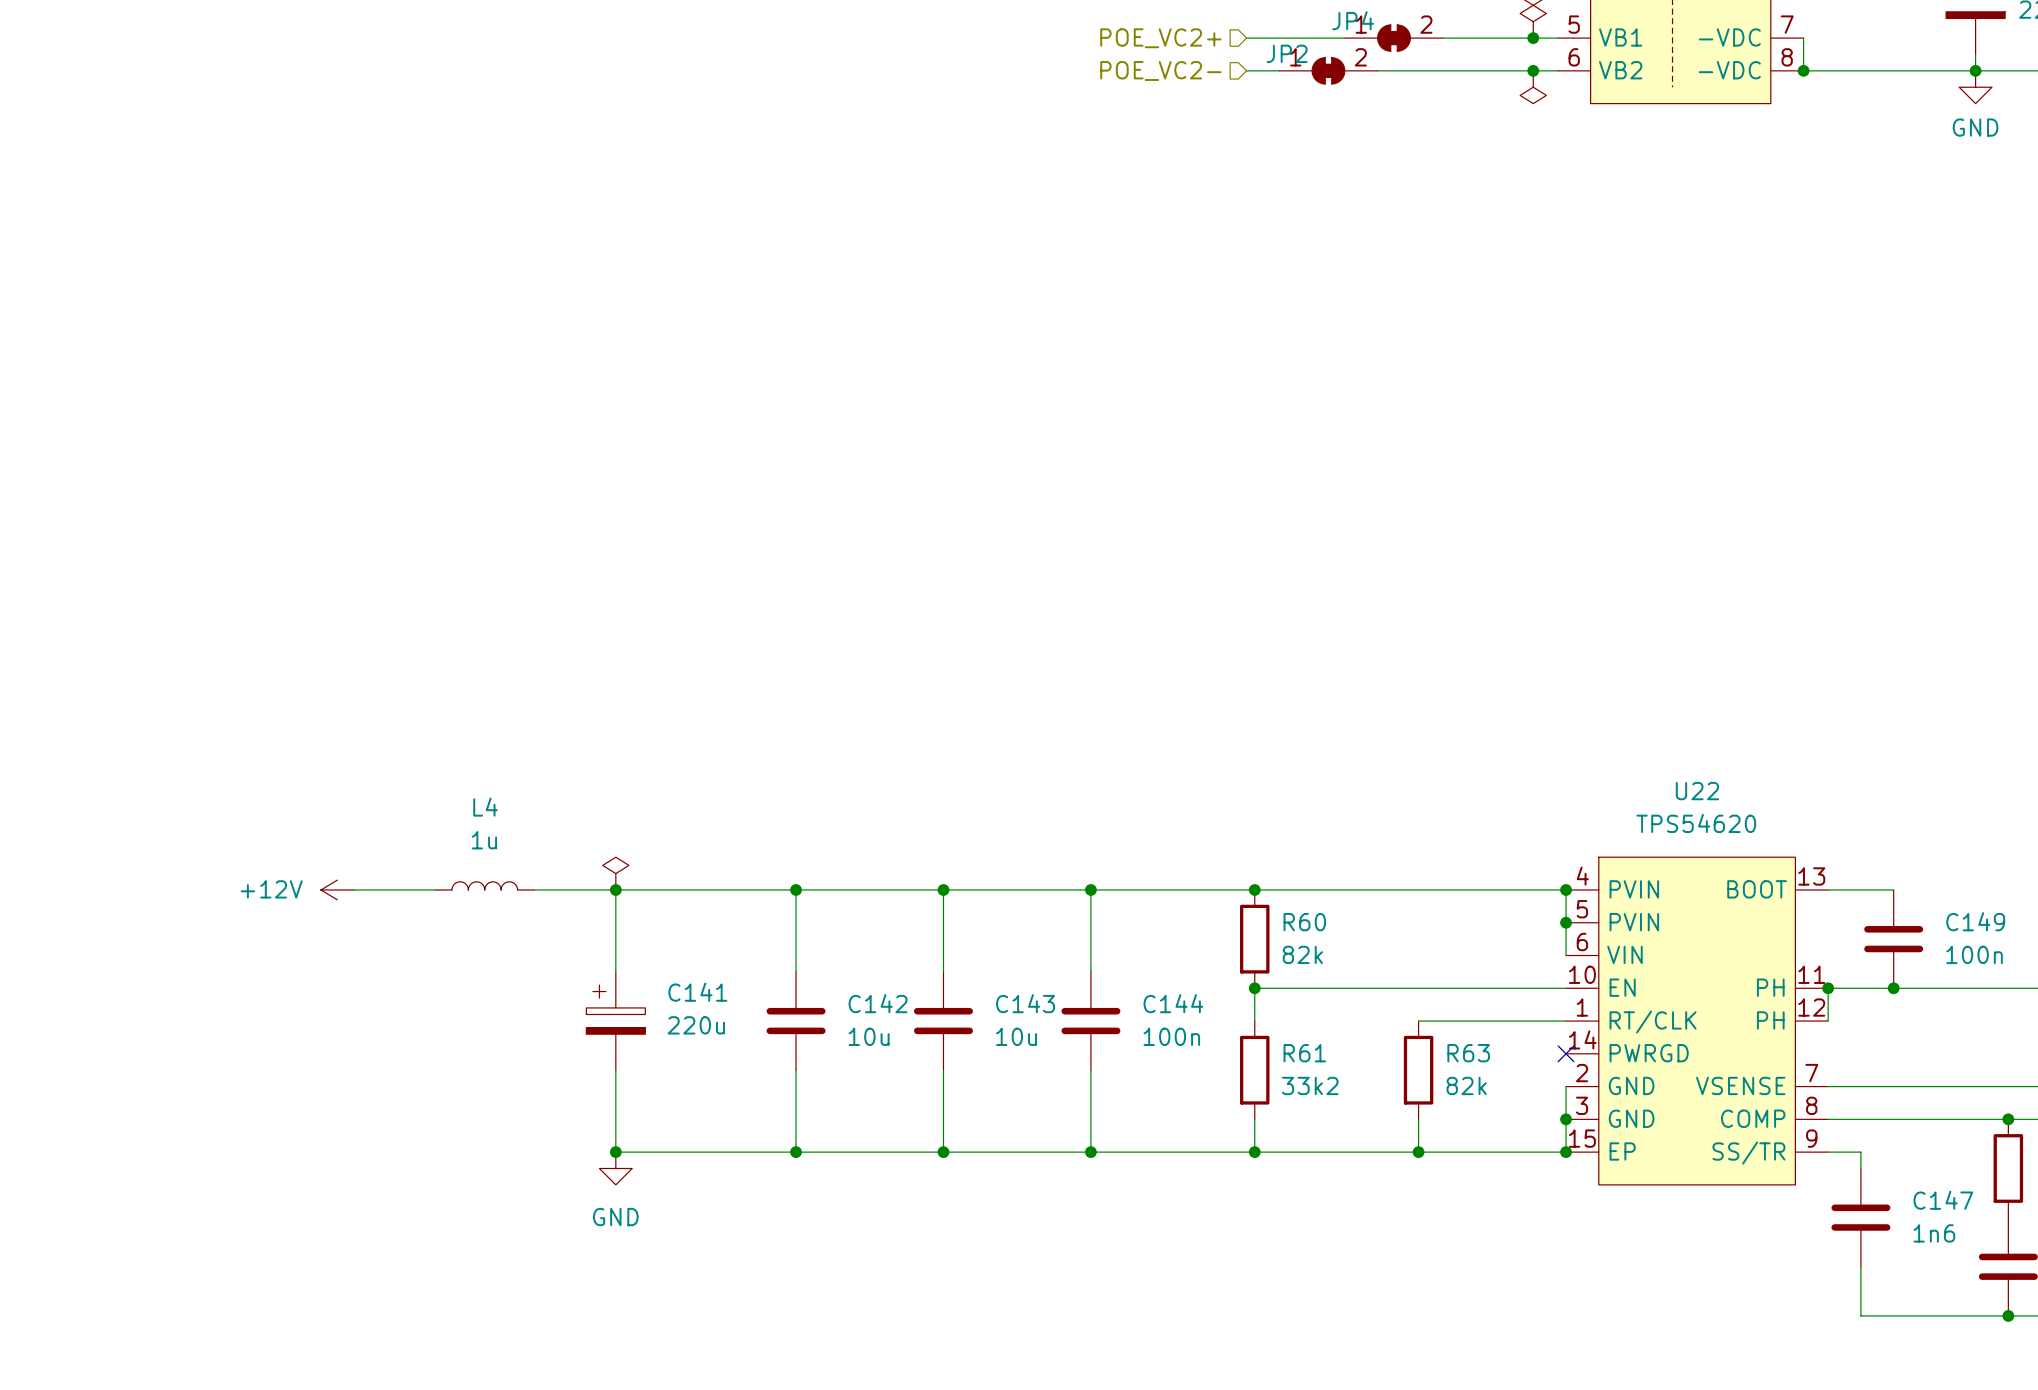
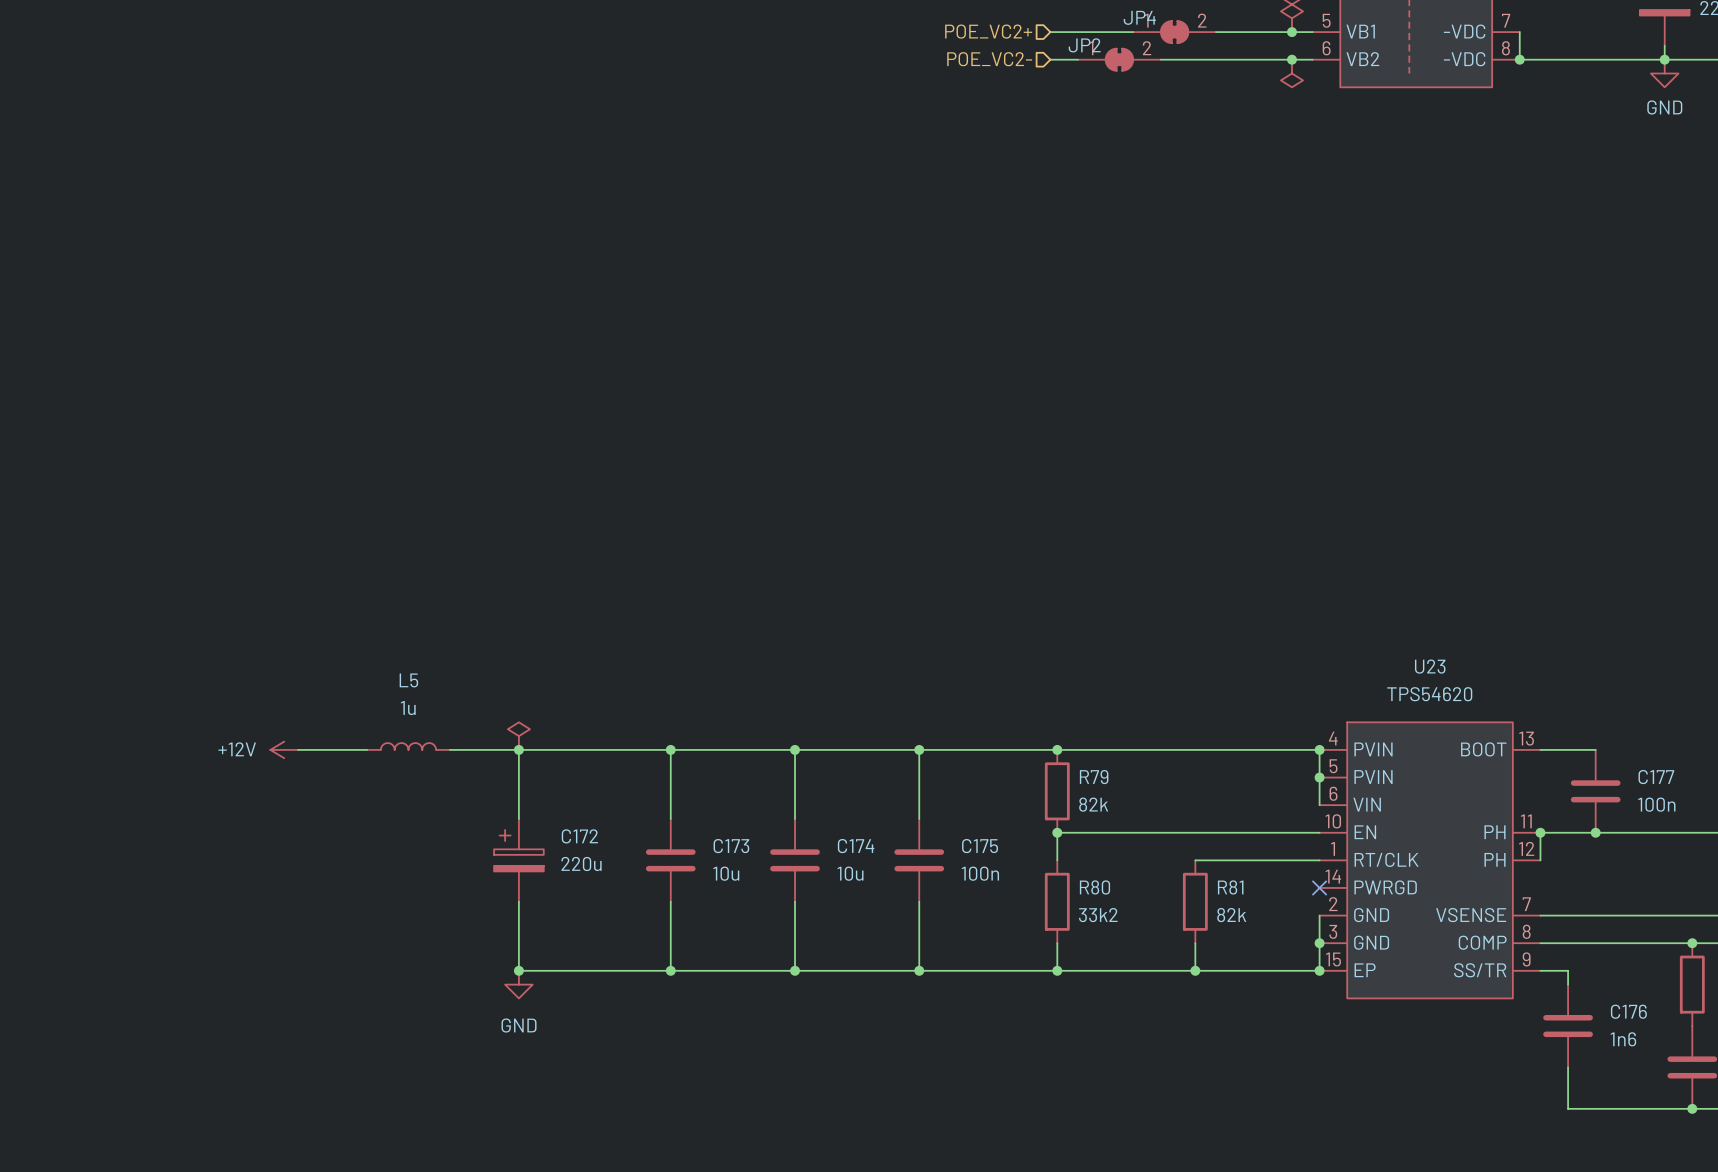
U22 name: U22 (1697, 791) -> U23 (1430, 666)
L4 name: L4 (485, 807) -> L5 (408, 680)
C149 name: C149 (1975, 921) -> C177 (1656, 777)
R60 name: R60 (1304, 922) -> R79 (1094, 777)
C141 name: C141 (697, 992) -> C172 (579, 836)
C142 name: C142 (878, 1003) -> C173 (731, 846)
C143 name: C143 (1025, 1003) -> C174 (856, 846)
C144 name: C144 (1173, 1003) -> C175 (980, 846)
R61 name: R61 (1304, 1053) -> R80 (1094, 887)
R63 name: R63 (1468, 1053) -> R81 (1230, 887)
C147 name: C147 (1943, 1200) -> C176 (1628, 1011)

